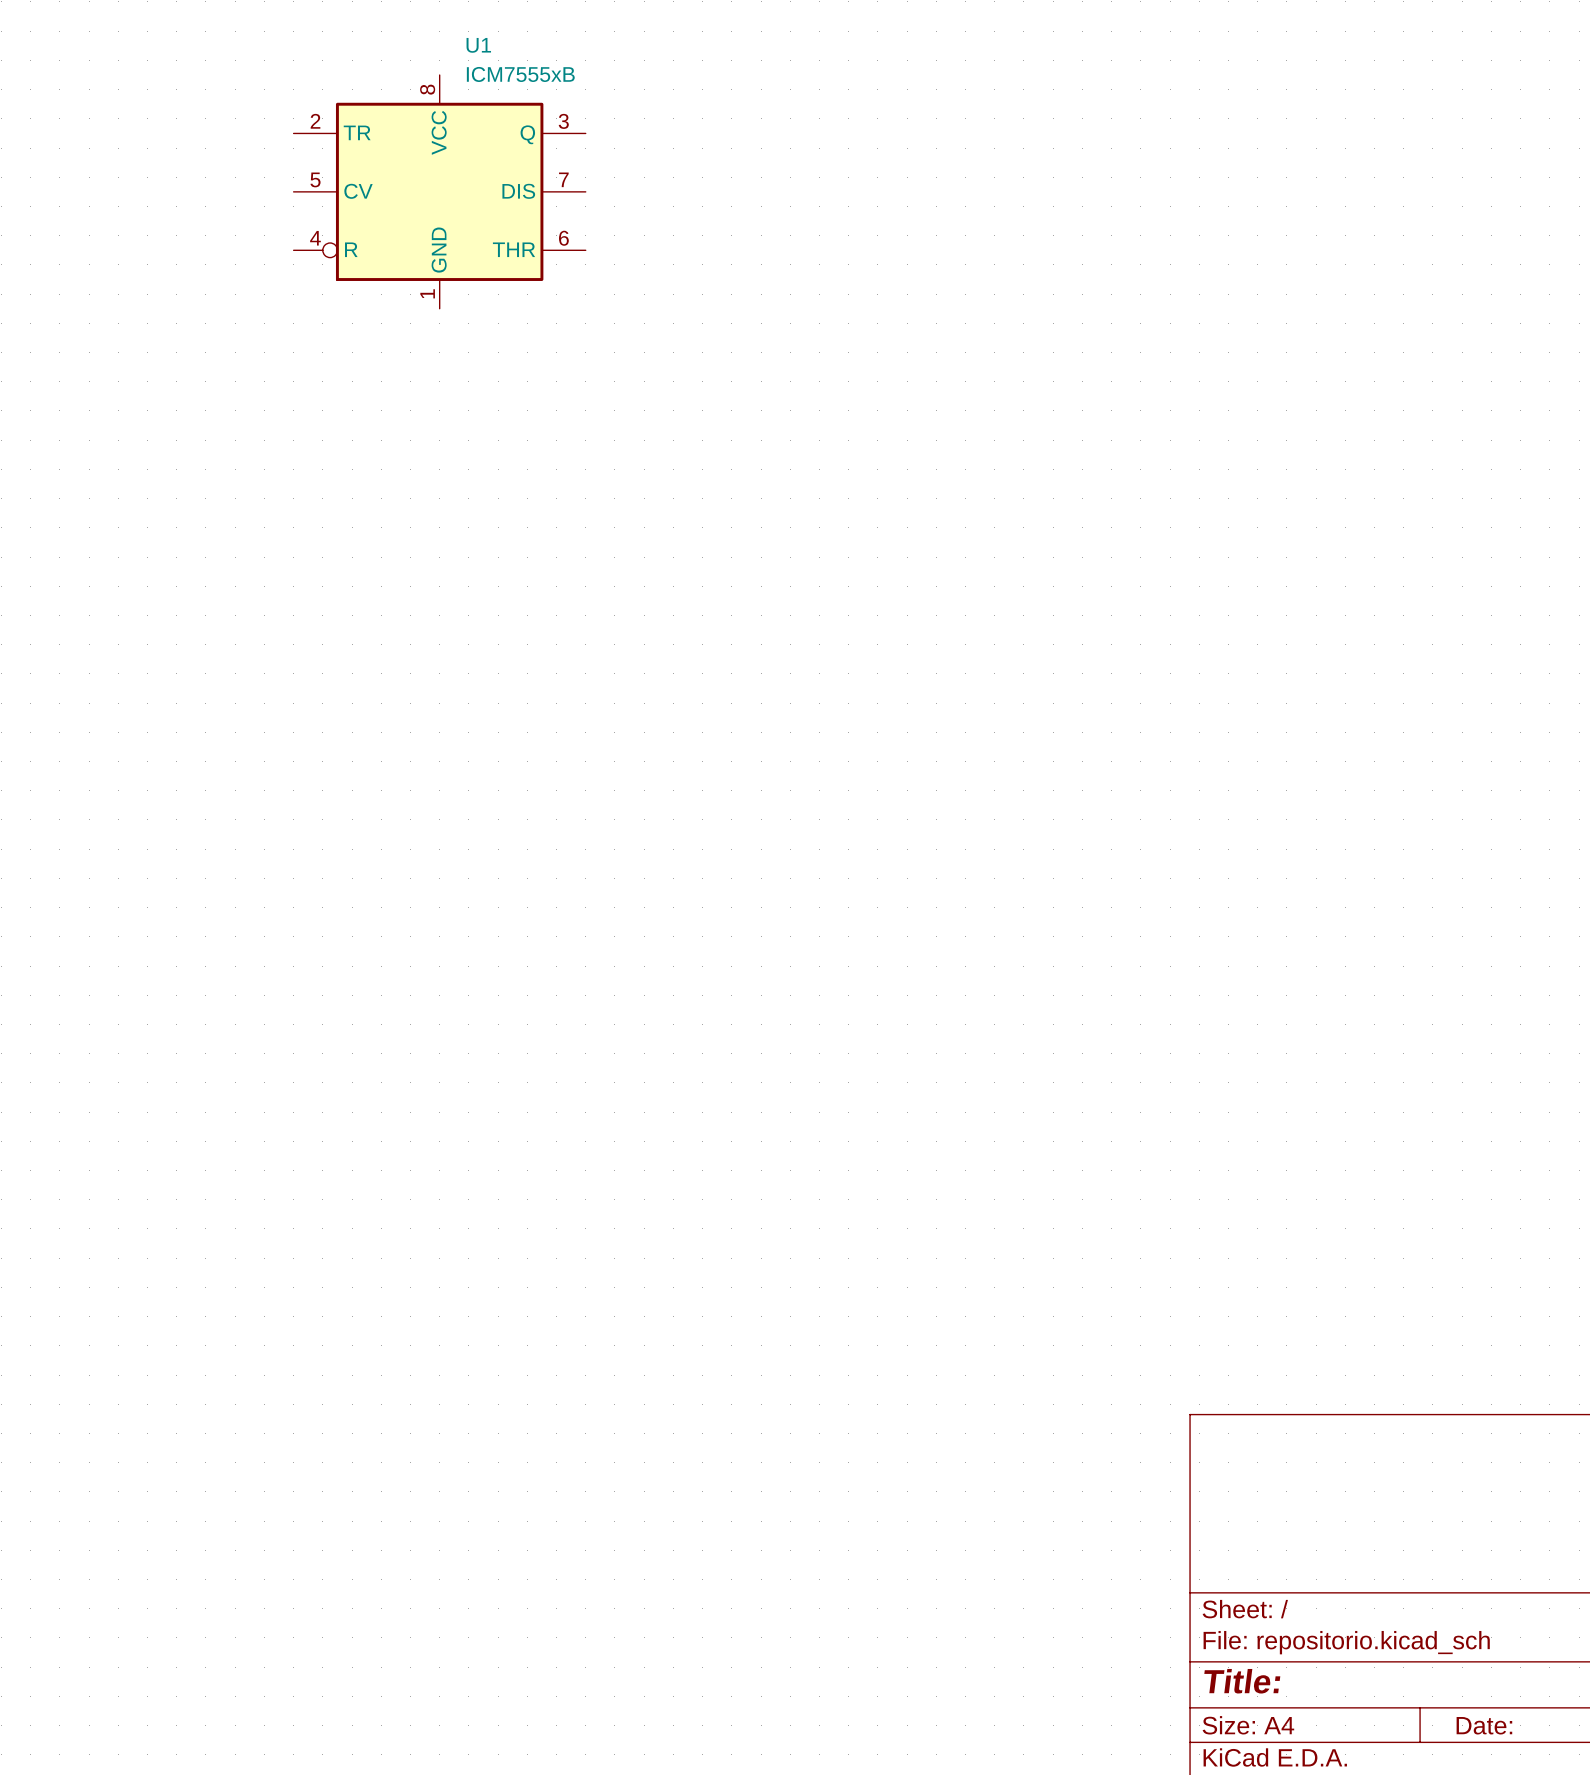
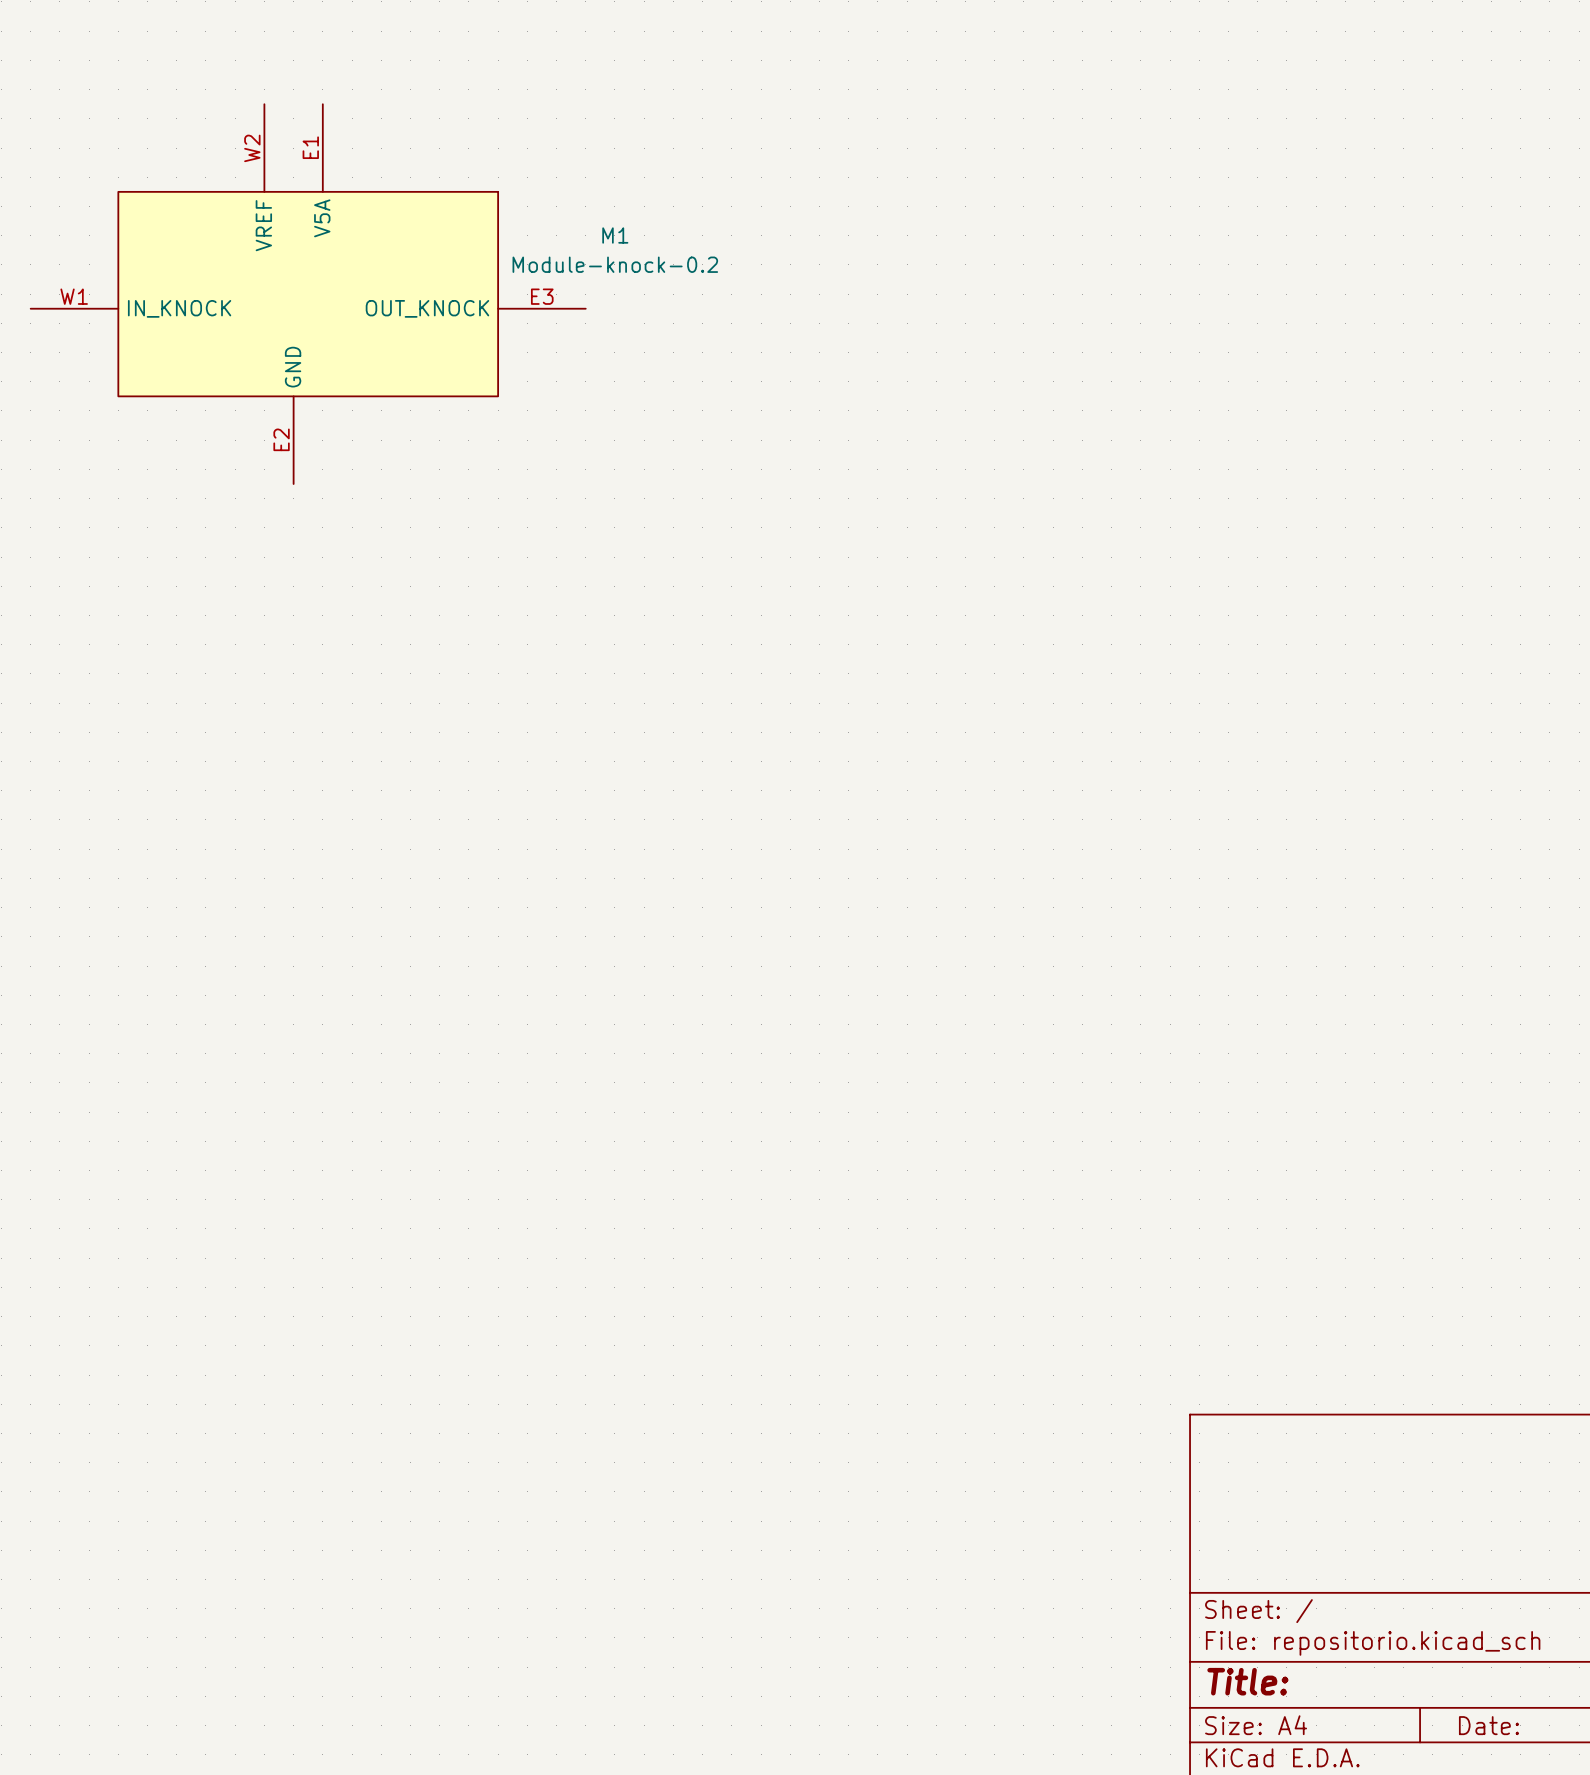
U1: ICM7555xB (439, 191) -> none
M1: none -> Module-knock-0.2 (308, 294)

